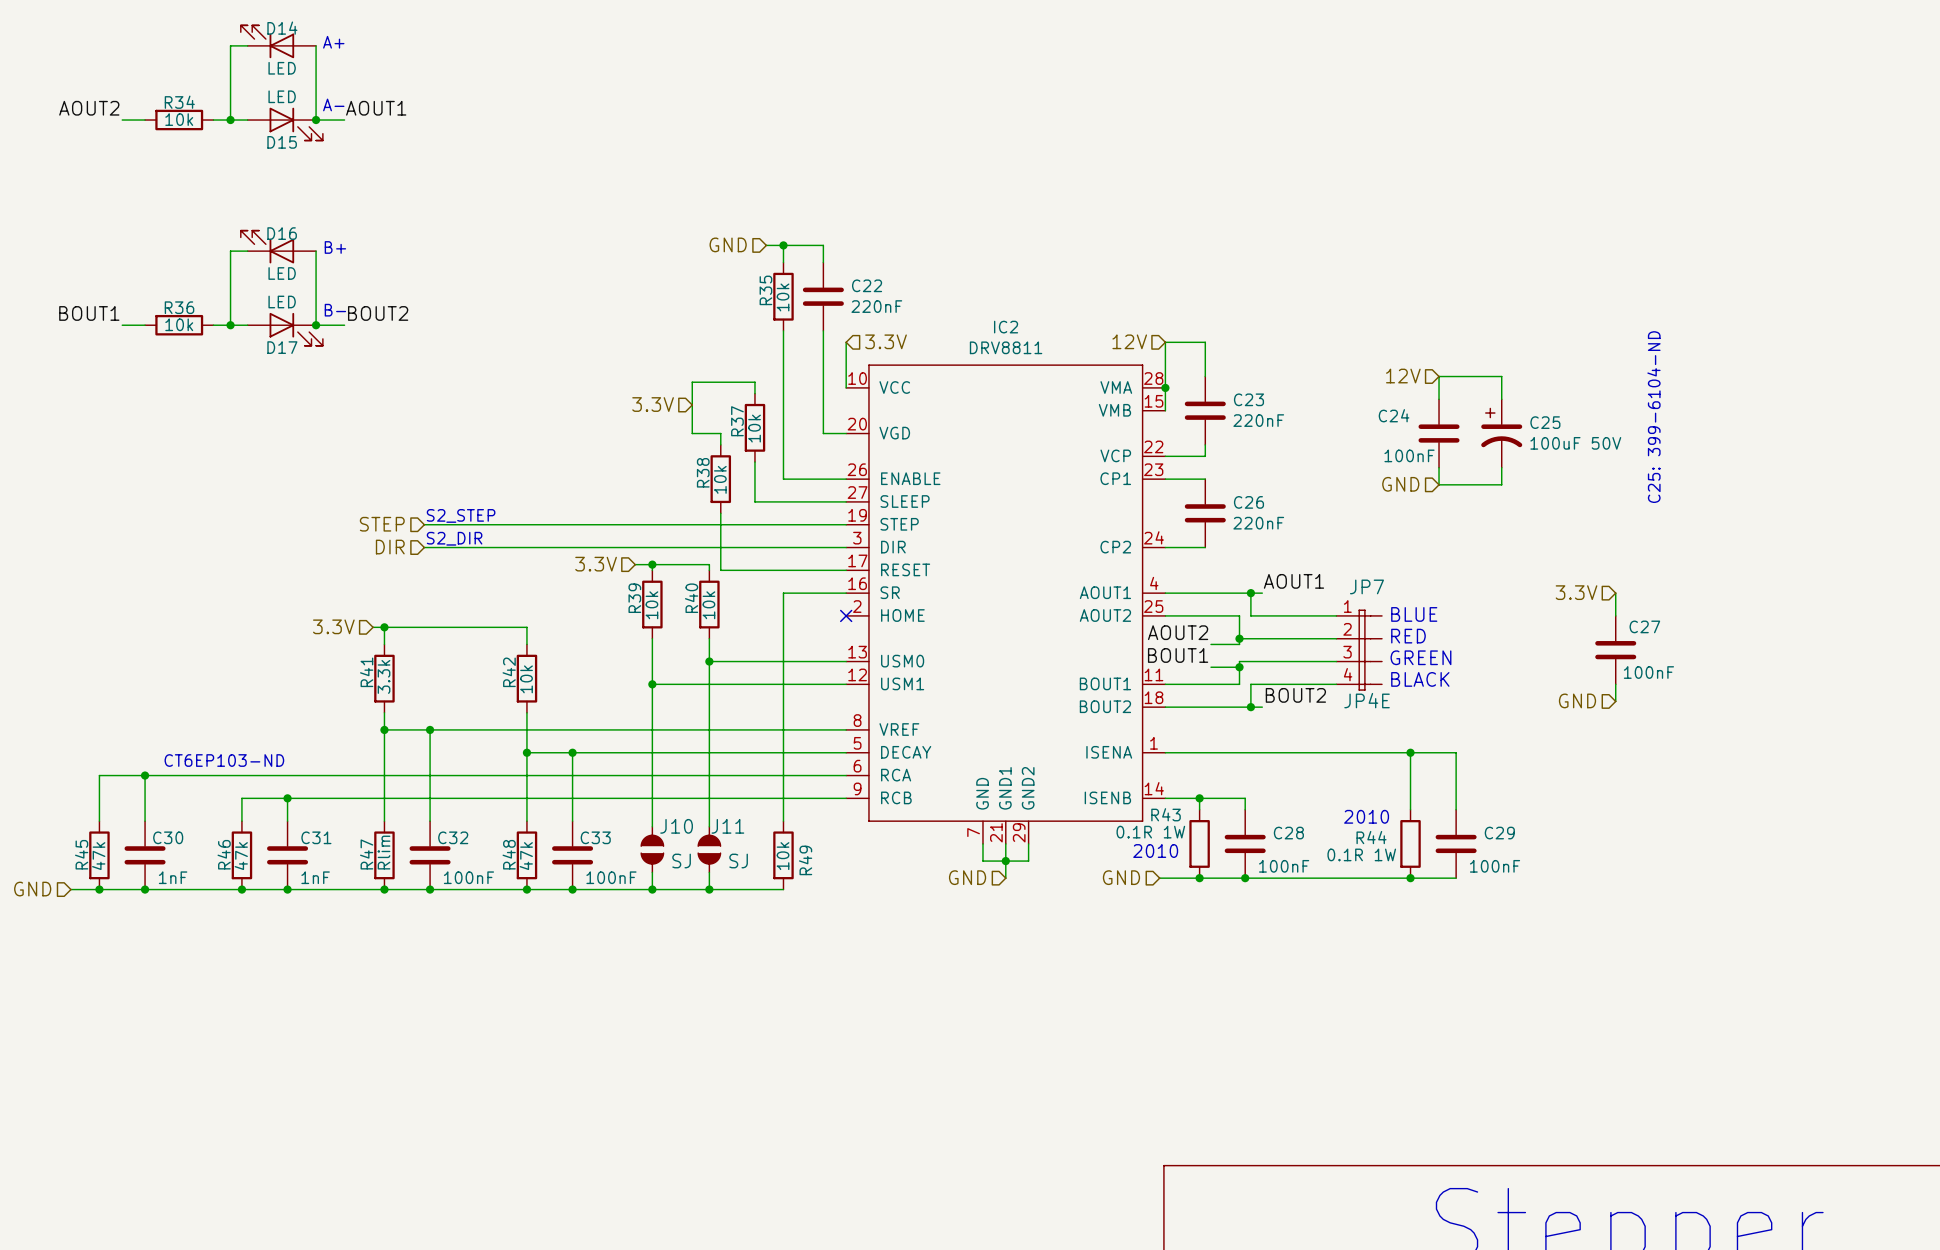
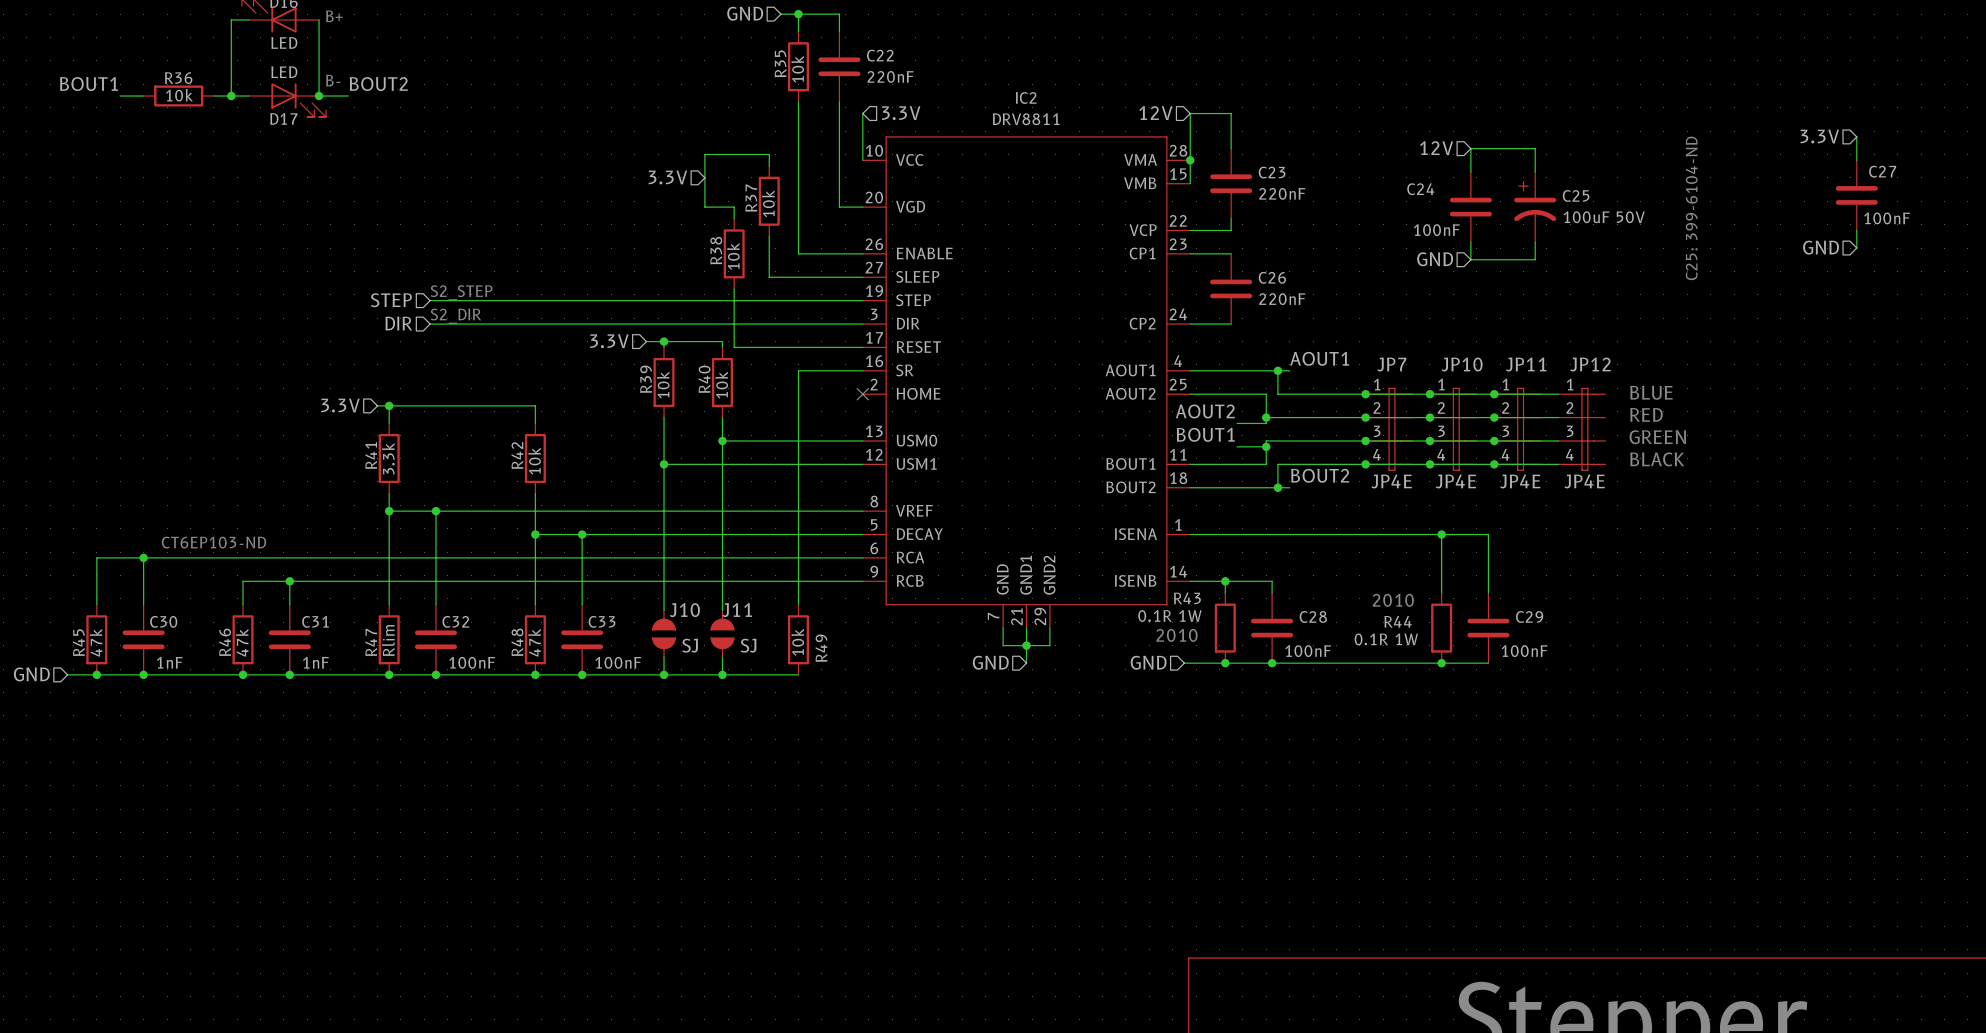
hierarchical label: none -> 3.3V (1819, 136)
wire: none -> (1856, 136) (1856, 160)
wire: none -> (1856, 230) (1856, 248)
hierarchical label: none -> GND (1821, 247)
hierarchical label: 3.3V (1576, 592) -> none
wire: (1615, 593) (1615, 615) -> none
text position: BLUE (1414, 614) -> BLUE (1651, 392)
wire: none -> (1365, 394) (1558, 394)
junction: none -> (1365, 394)
junction: none -> (1429, 394)
junction: none -> (1494, 394)
text position: RED (1408, 636) -> RED (1646, 414)
wire: none -> (1365, 417) (1558, 417)
junction: none -> (1365, 417)
junction: none -> (1429, 417)
junction: none -> (1494, 417)
JP10: none -> JP4E (1453, 429)
JP11: none -> JP4E (1517, 429)
JP12: none -> JP4E (1581, 429)
C27 position: (1615, 650) -> (1856, 195)
text position: GREEN (1420, 657) -> GREEN (1657, 437)
wire: none -> (1365, 440) (1558, 440)
junction: none -> (1365, 440)
junction: none -> (1429, 440)
junction: none -> (1494, 440)
text position: BLACK (1420, 679) -> BLACK (1657, 459)
wire: none -> (1365, 464) (1558, 464)
junction: none -> (1365, 464)
junction: none -> (1429, 464)
junction: none -> (1494, 464)
wire: (1615, 684) (1615, 701) -> none
hierarchical label: GND (1577, 700) -> none

